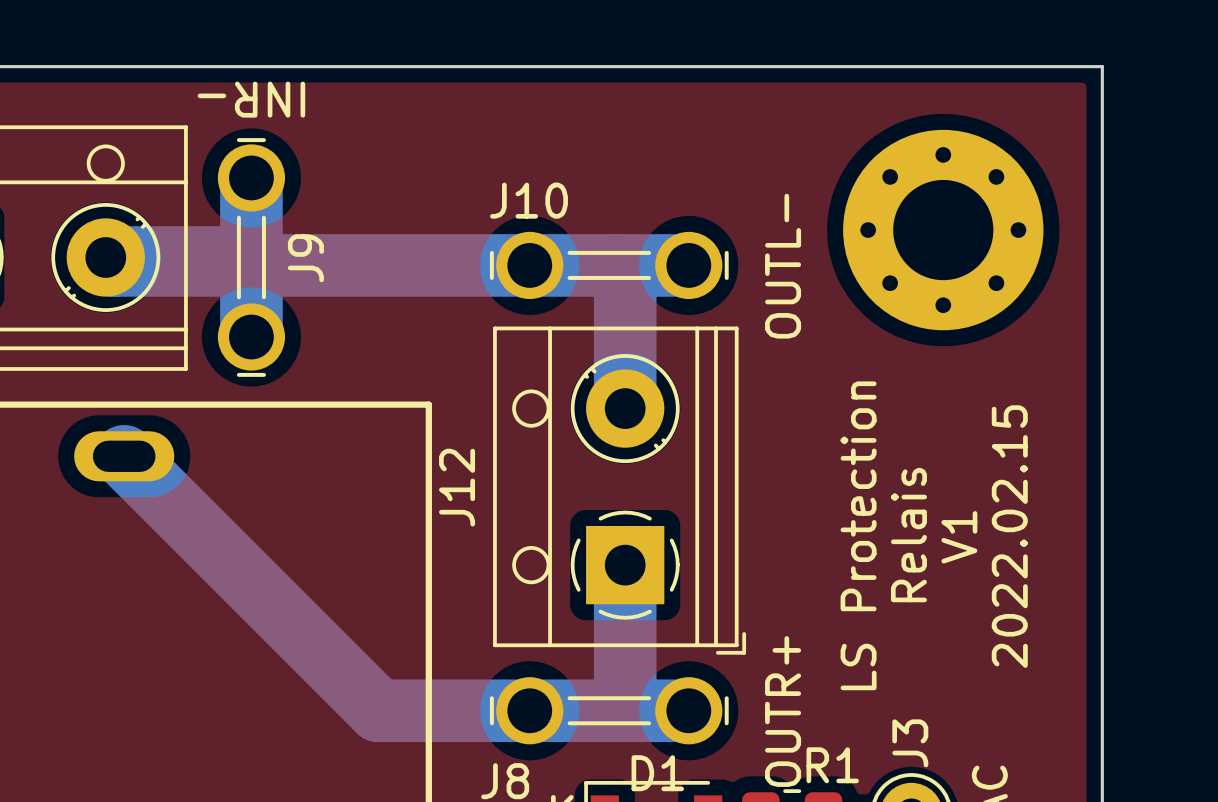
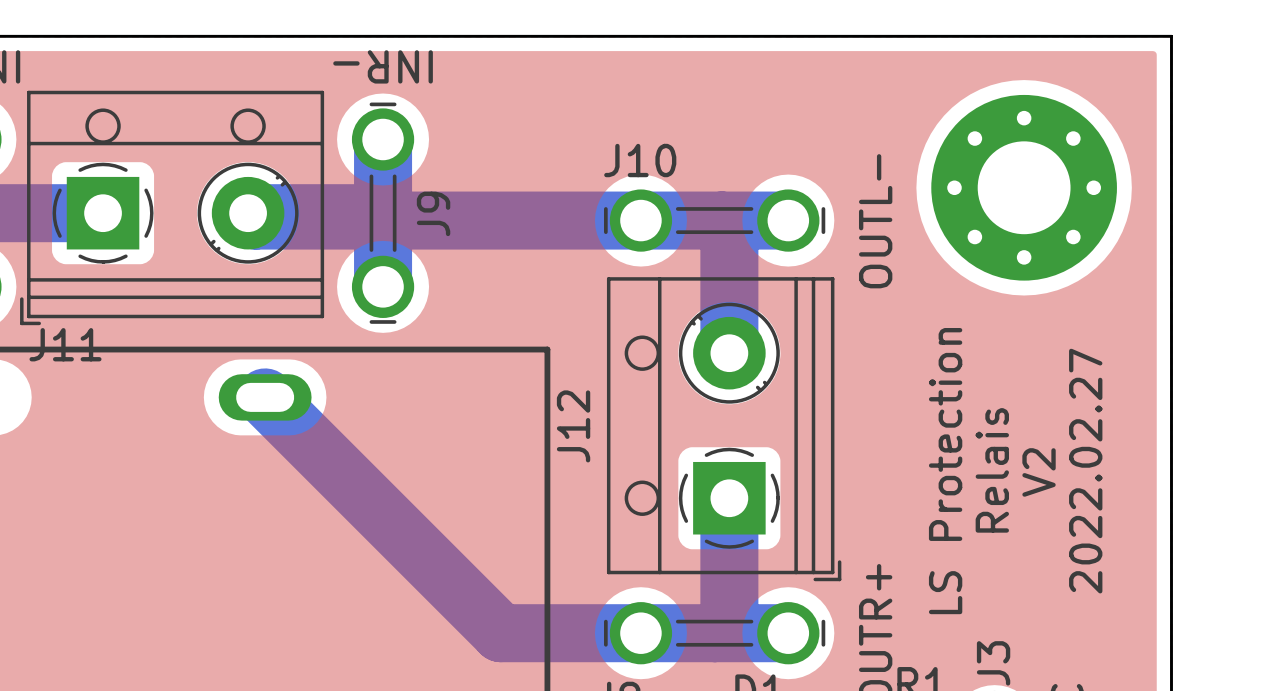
text: 2022.02.15 (1009, 536) -> 2022.02.27 (1085, 471)
text: V1 (959, 537) -> V2 (1039, 472)

